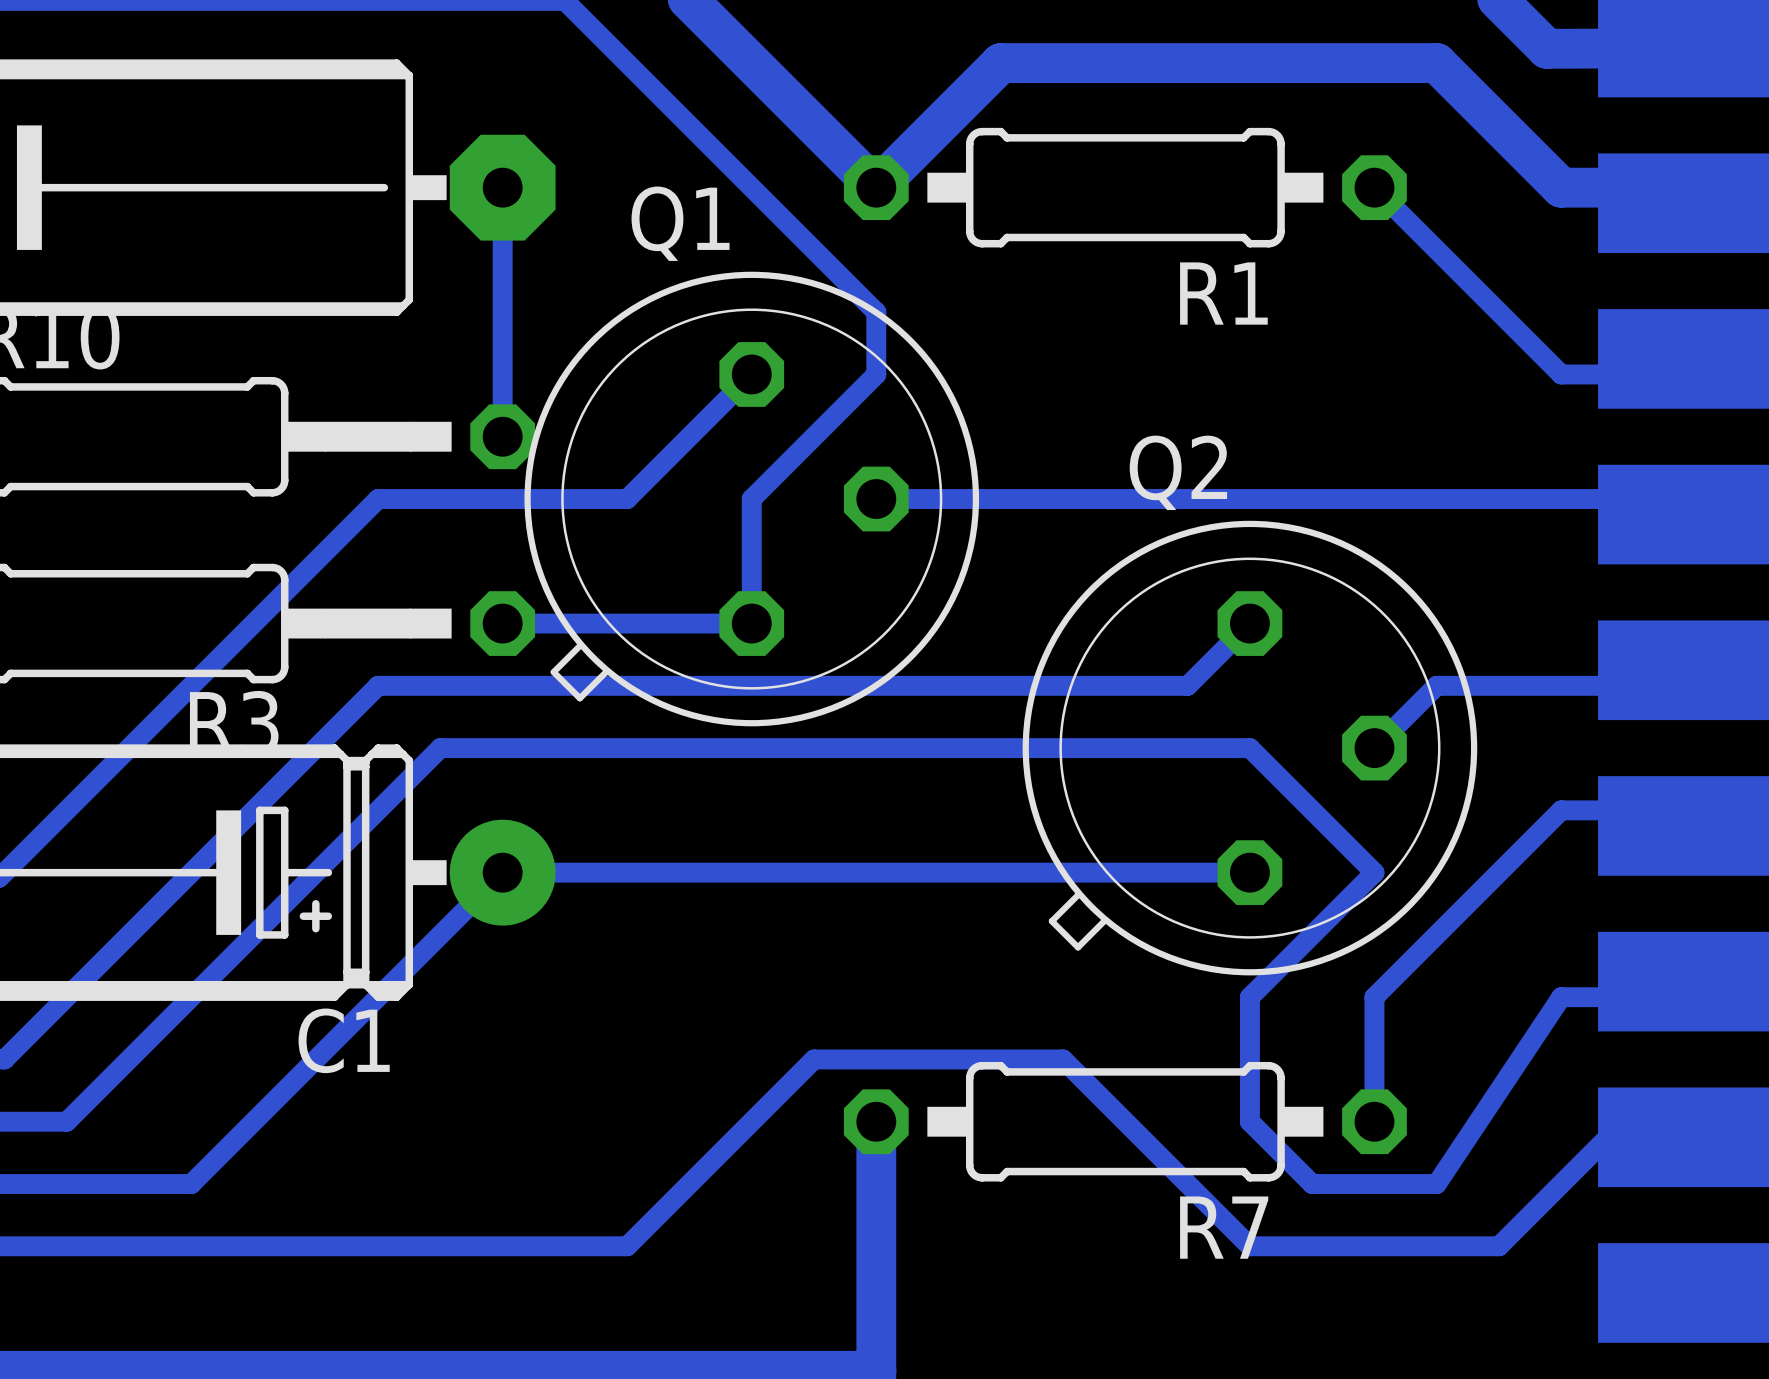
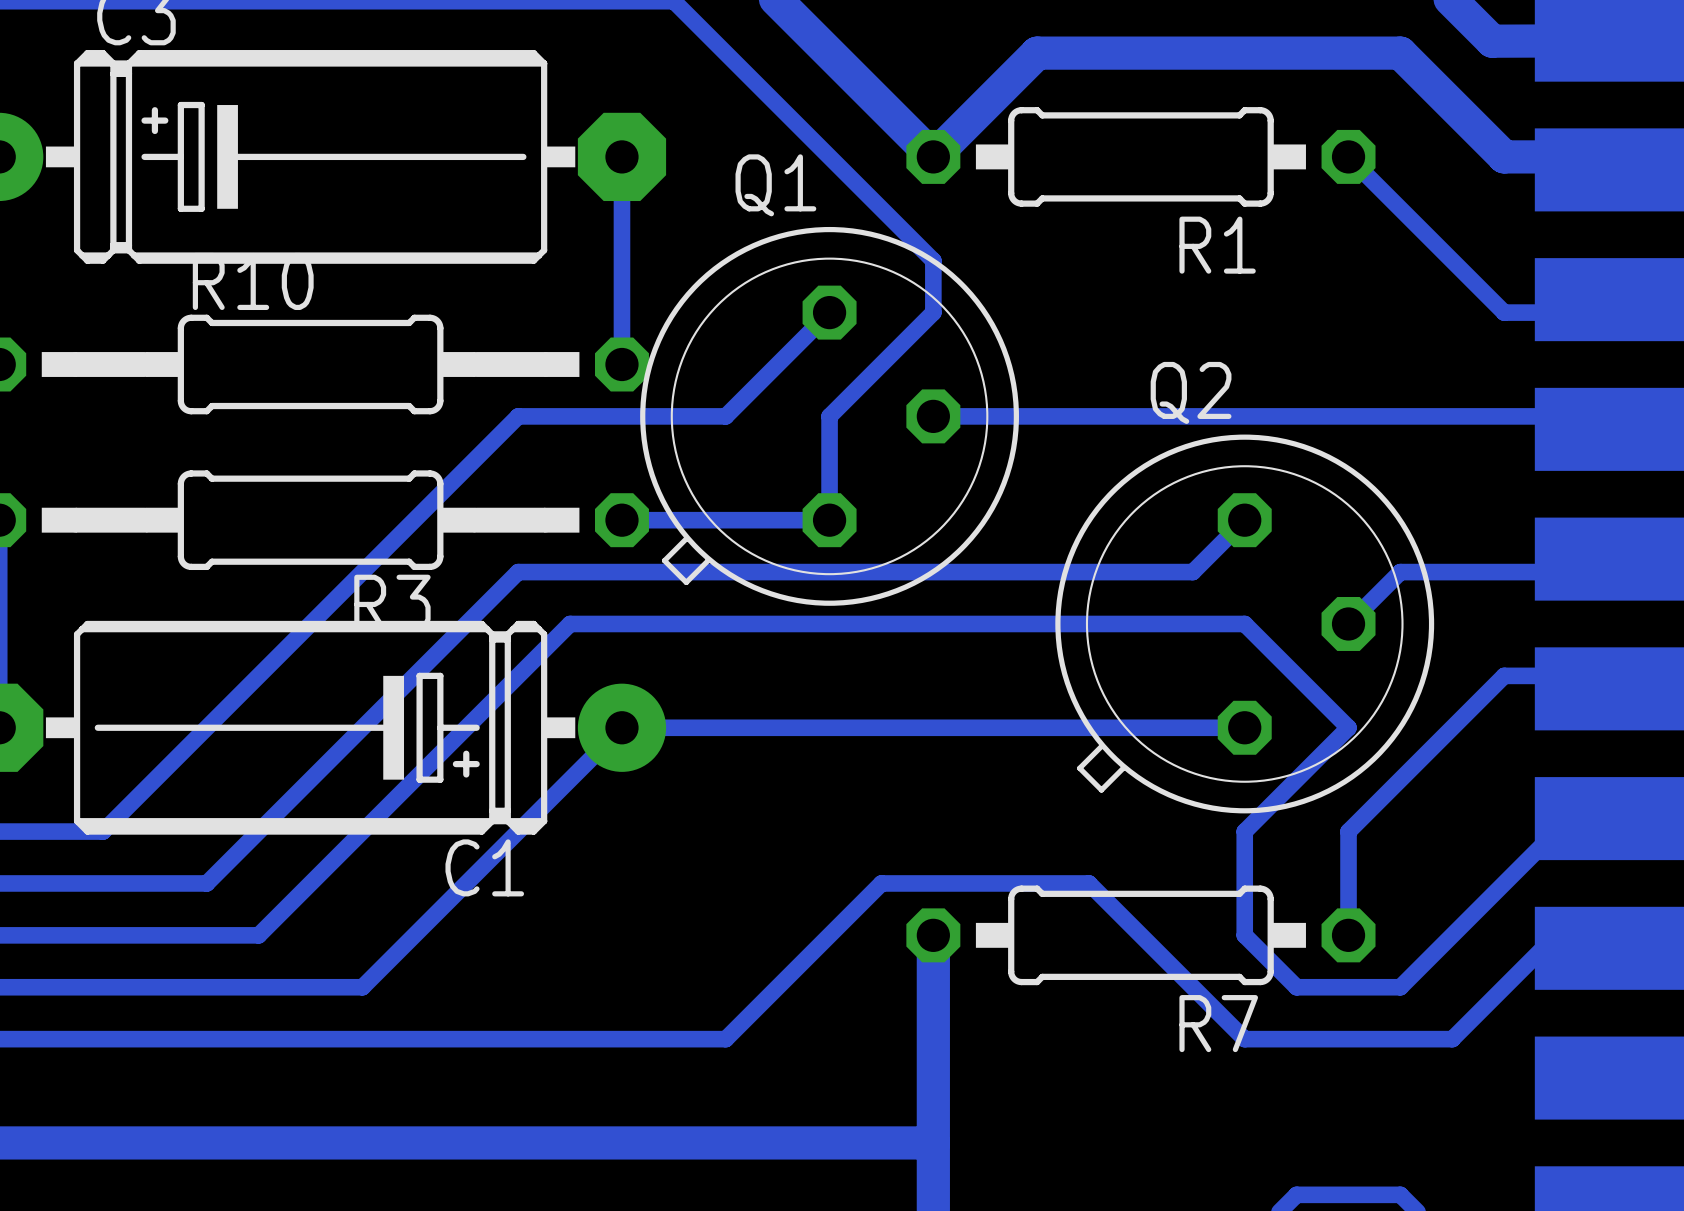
bottom track: (1623, 997) (1561, 997) (1436, 1184) -> (1556, 831) (1400, 987)

